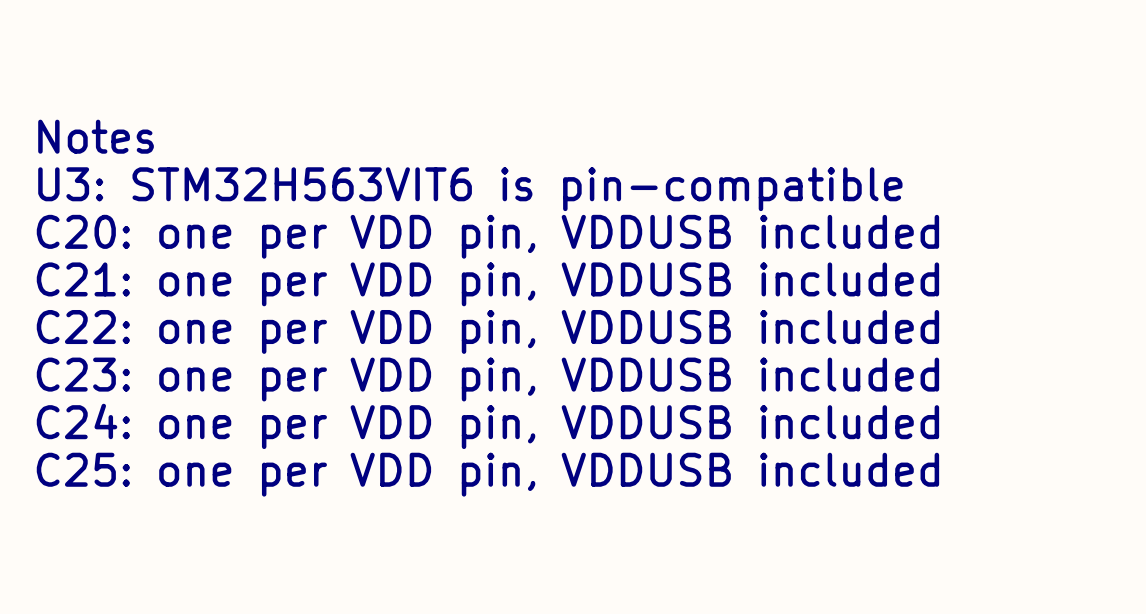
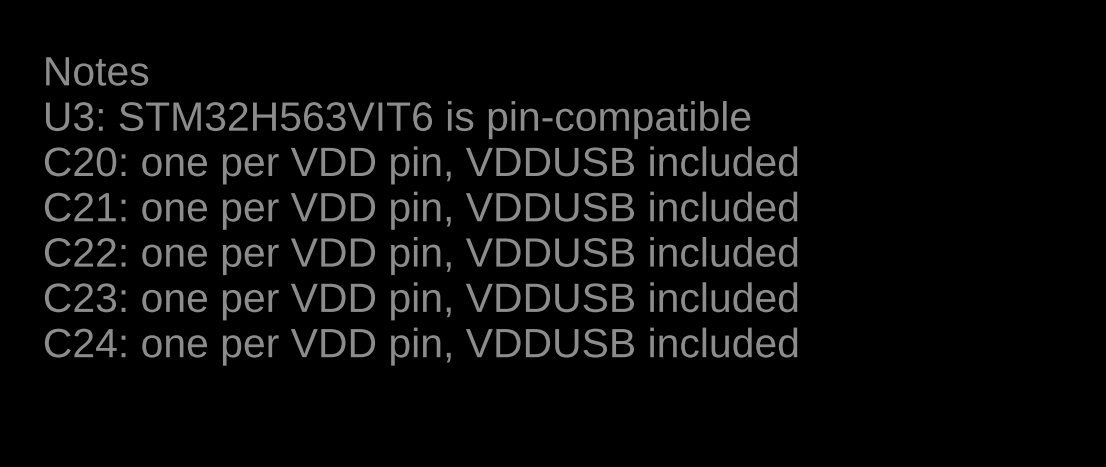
text: C25: one per VDD pin, VDDUSB included (487, 474) -> none

